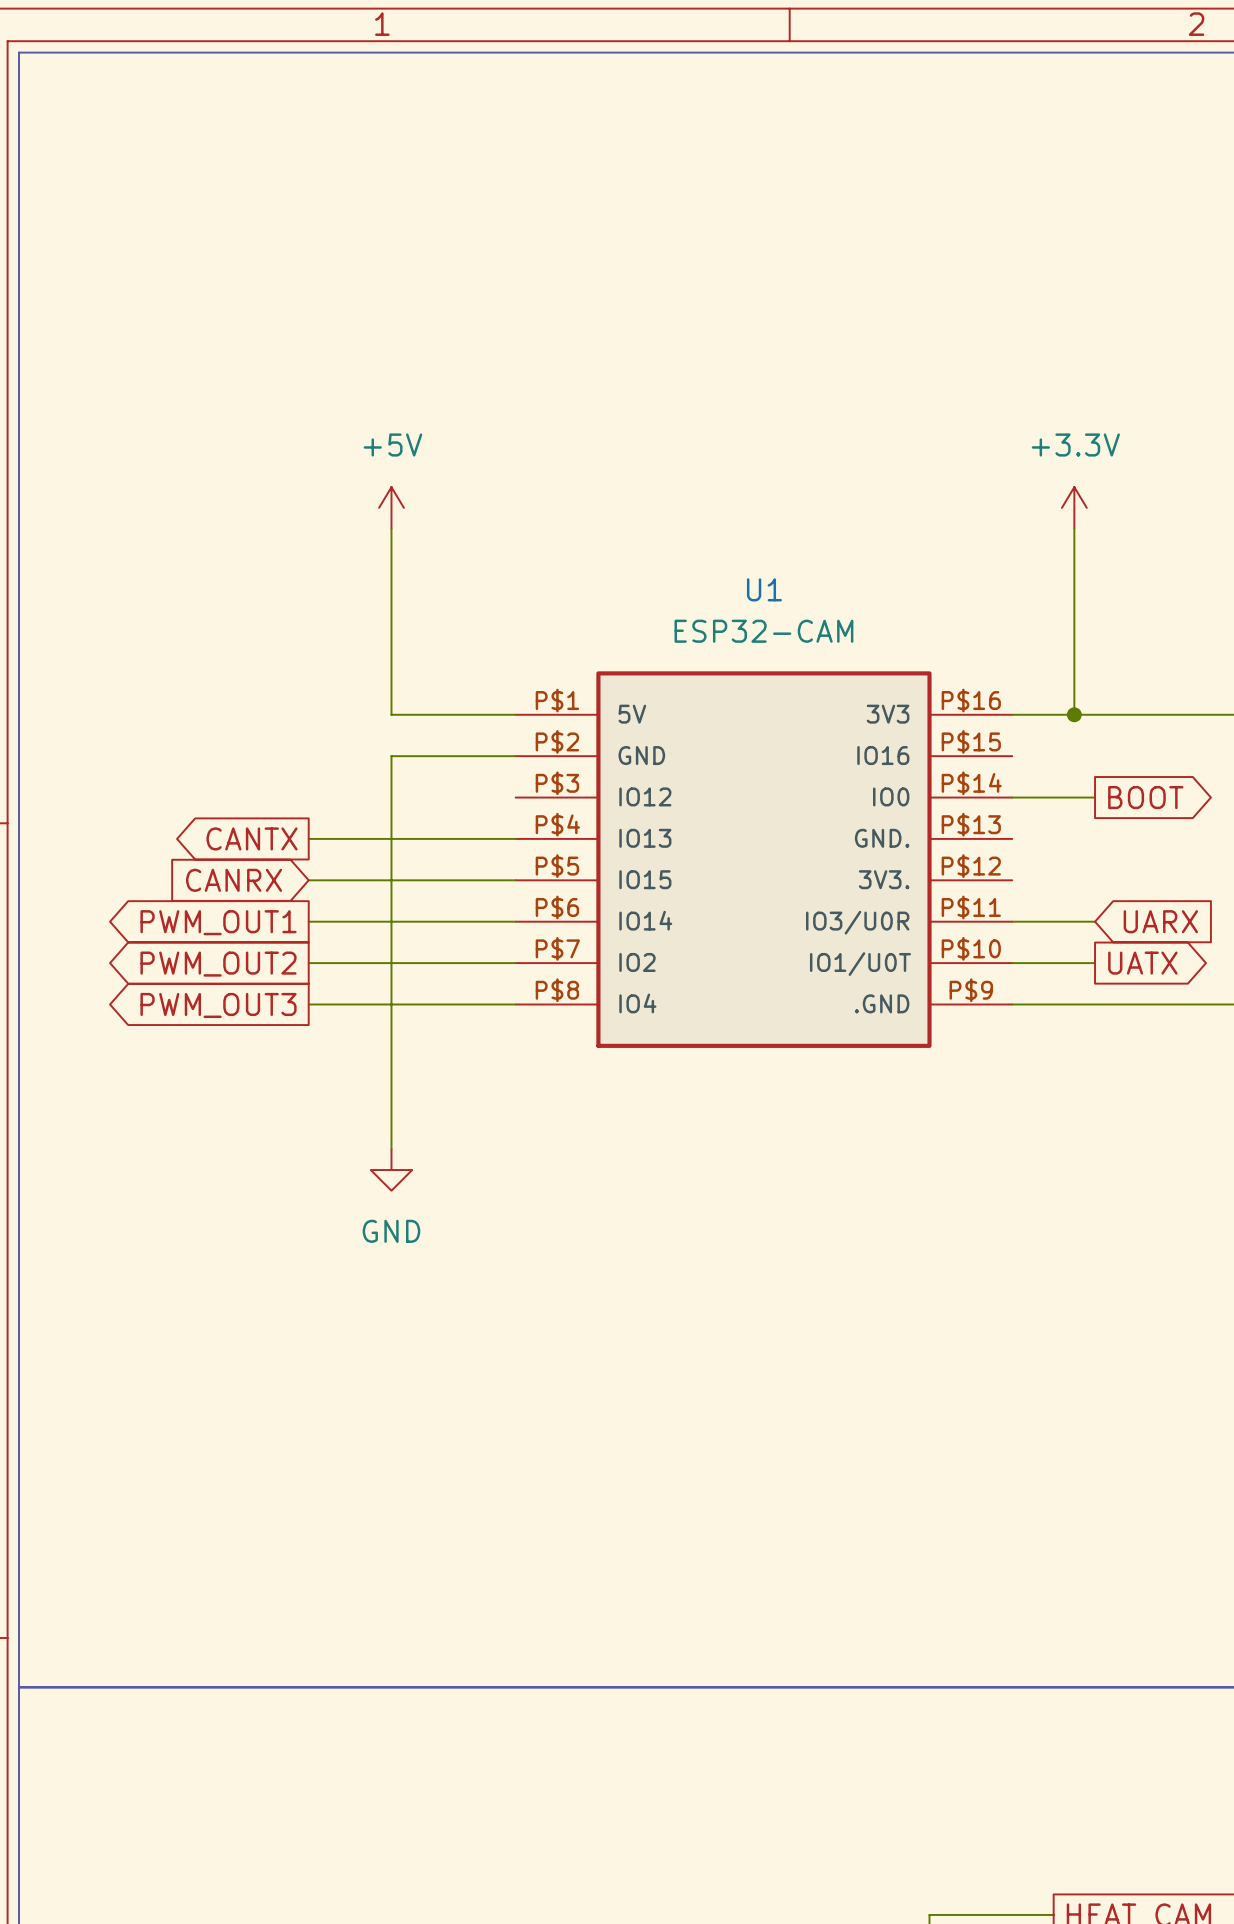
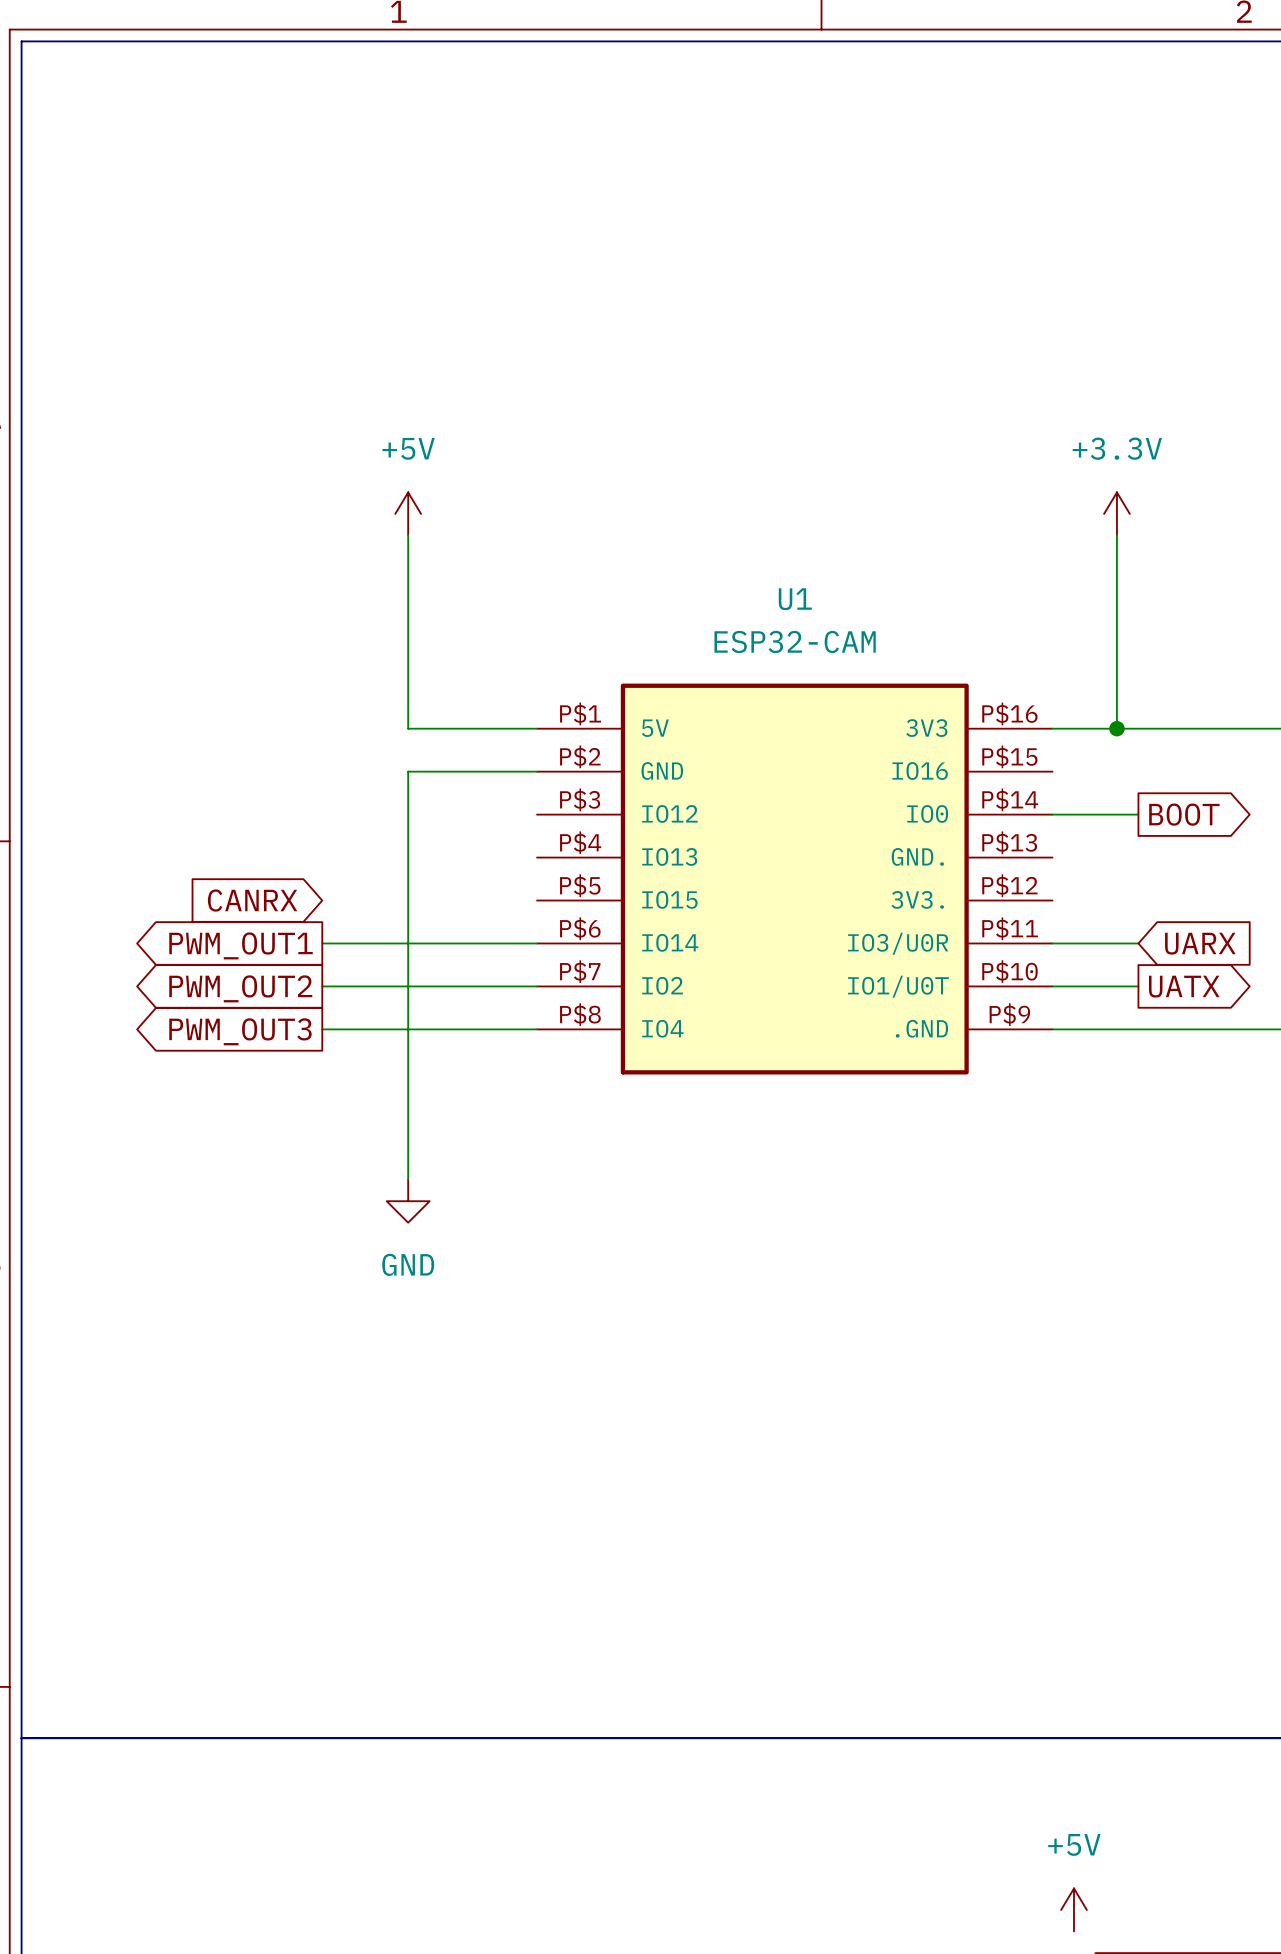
global label: CANTX (252, 838) -> none
wire: (308, 838) (515, 838) -> none
wire: (308, 880) (515, 880) -> none
power symbol: none -> +5V (1073, 1909)

